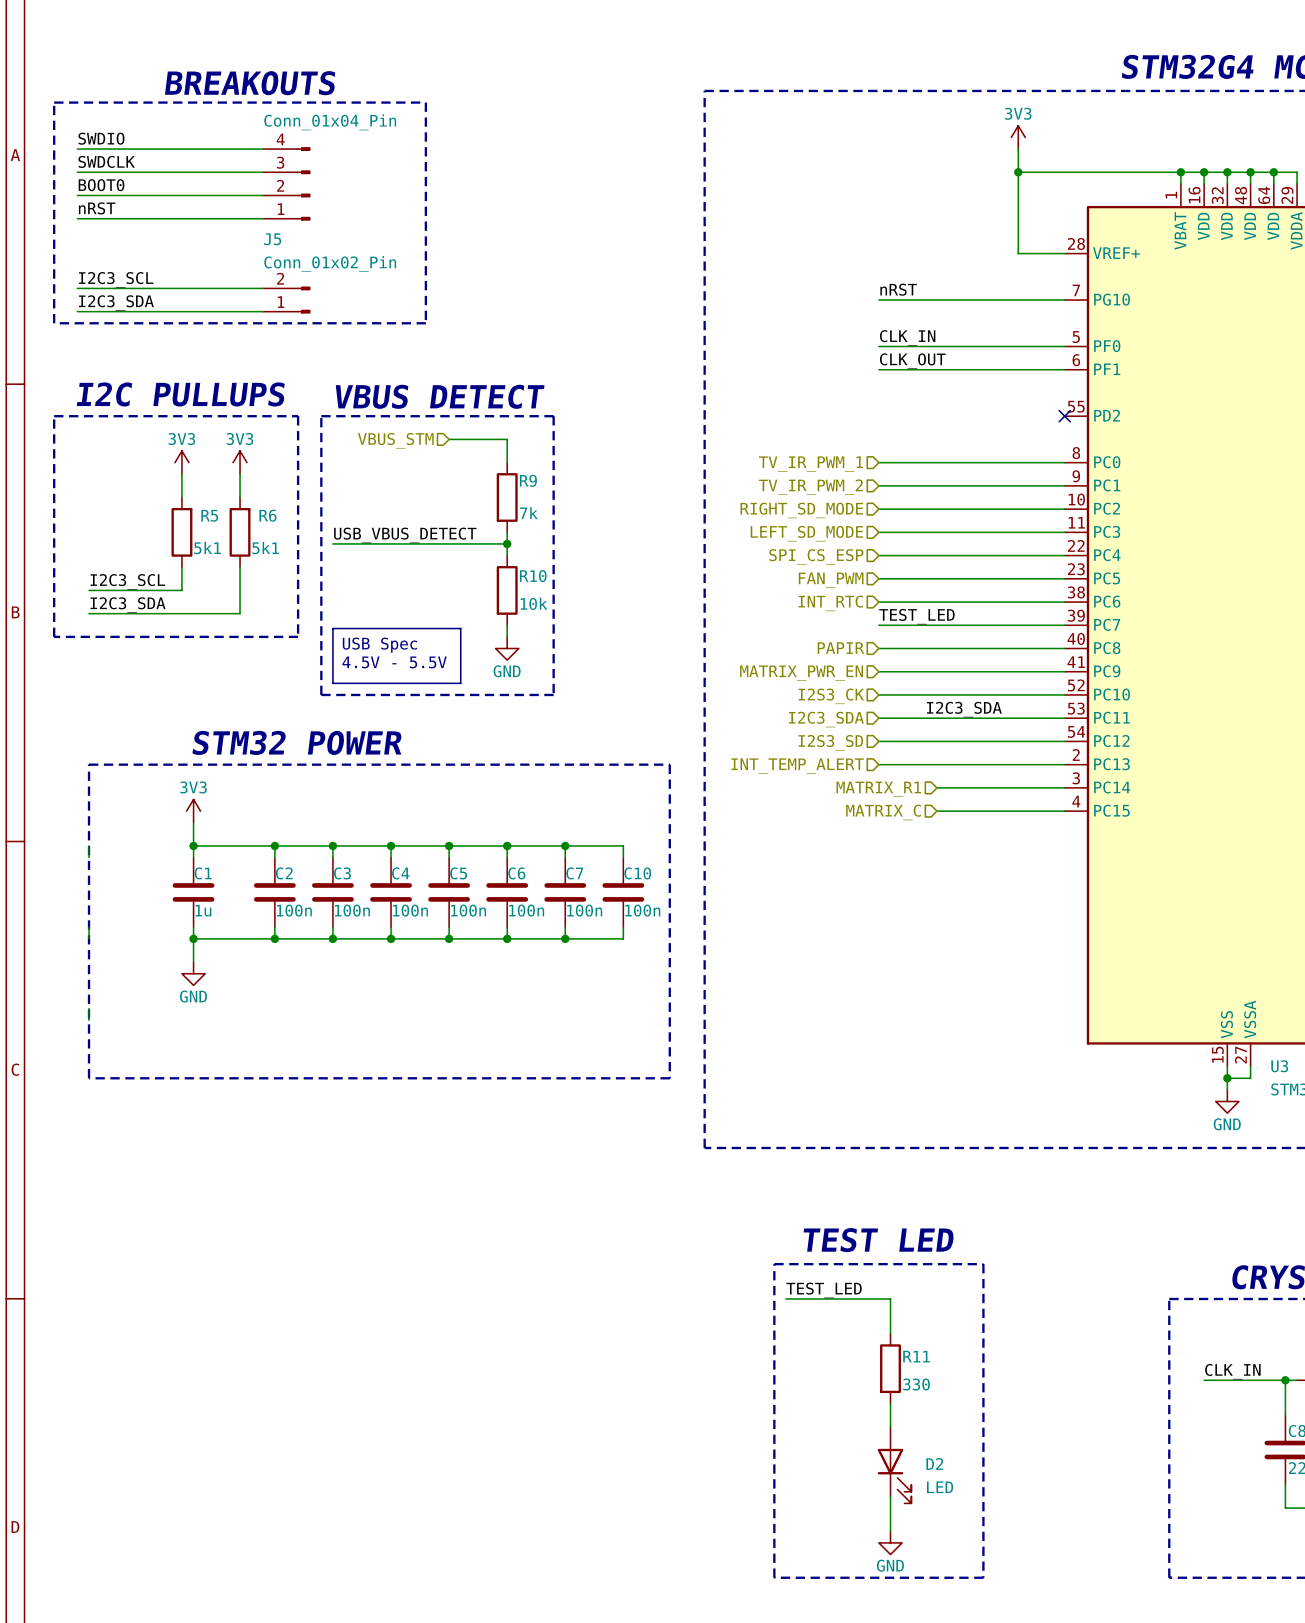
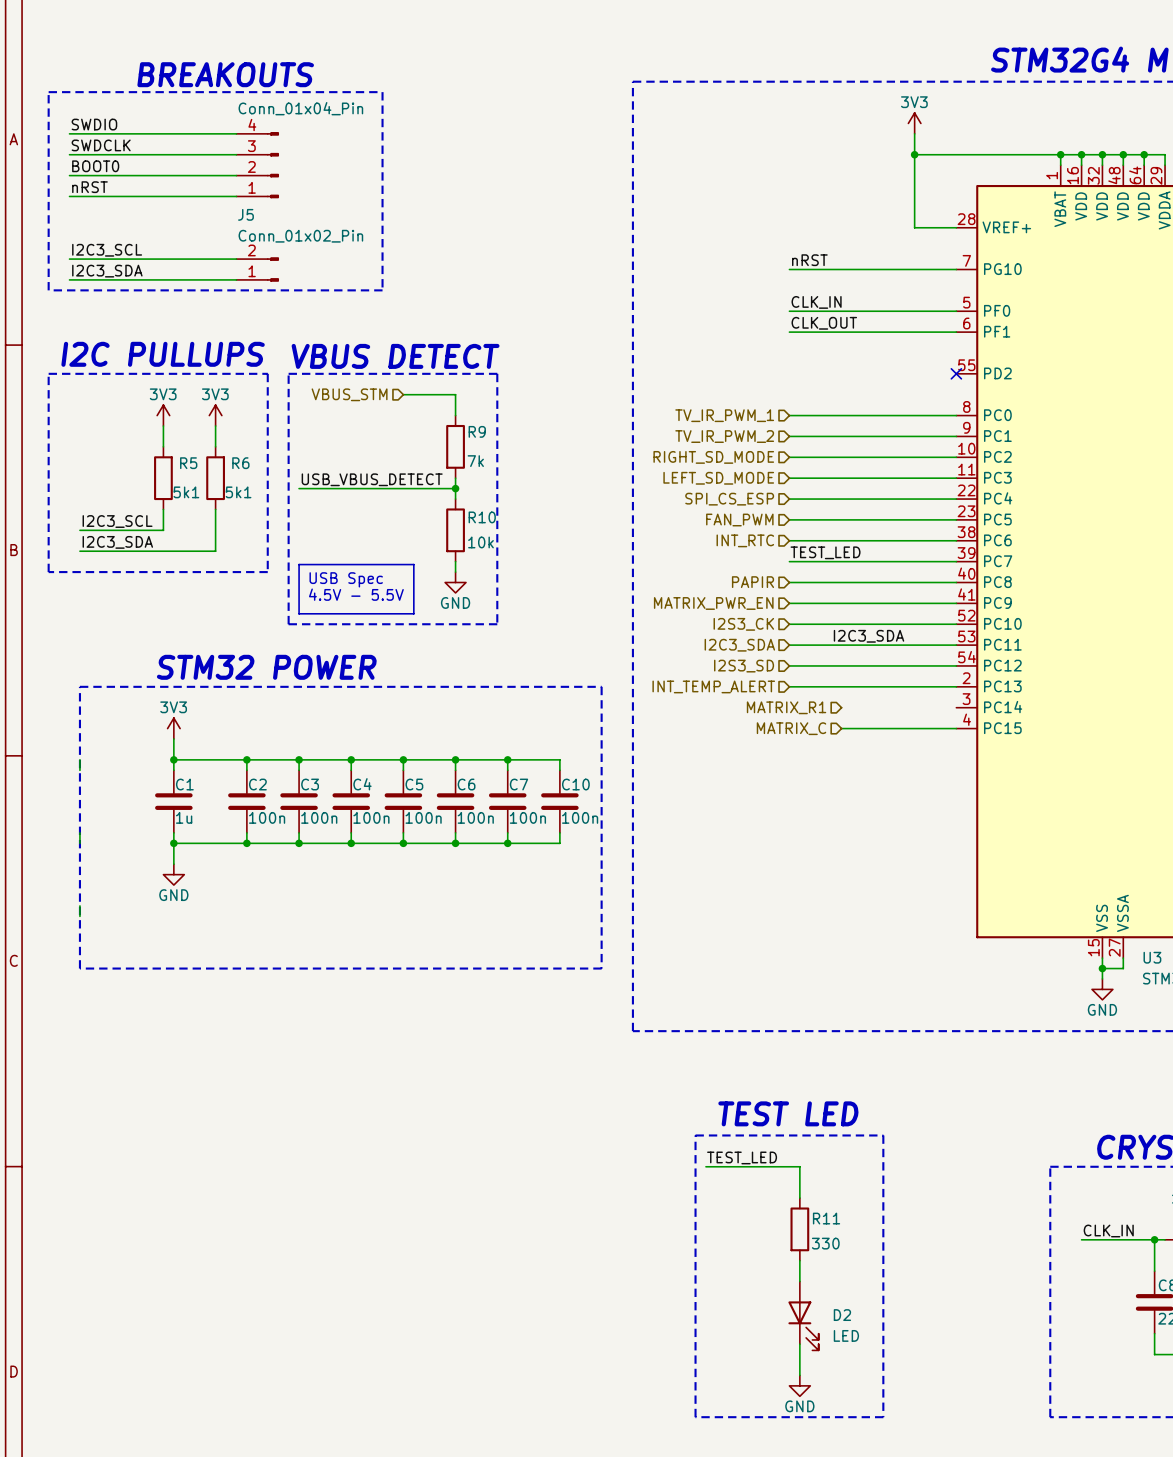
wire: (936, 787) (1064, 787) -> none

